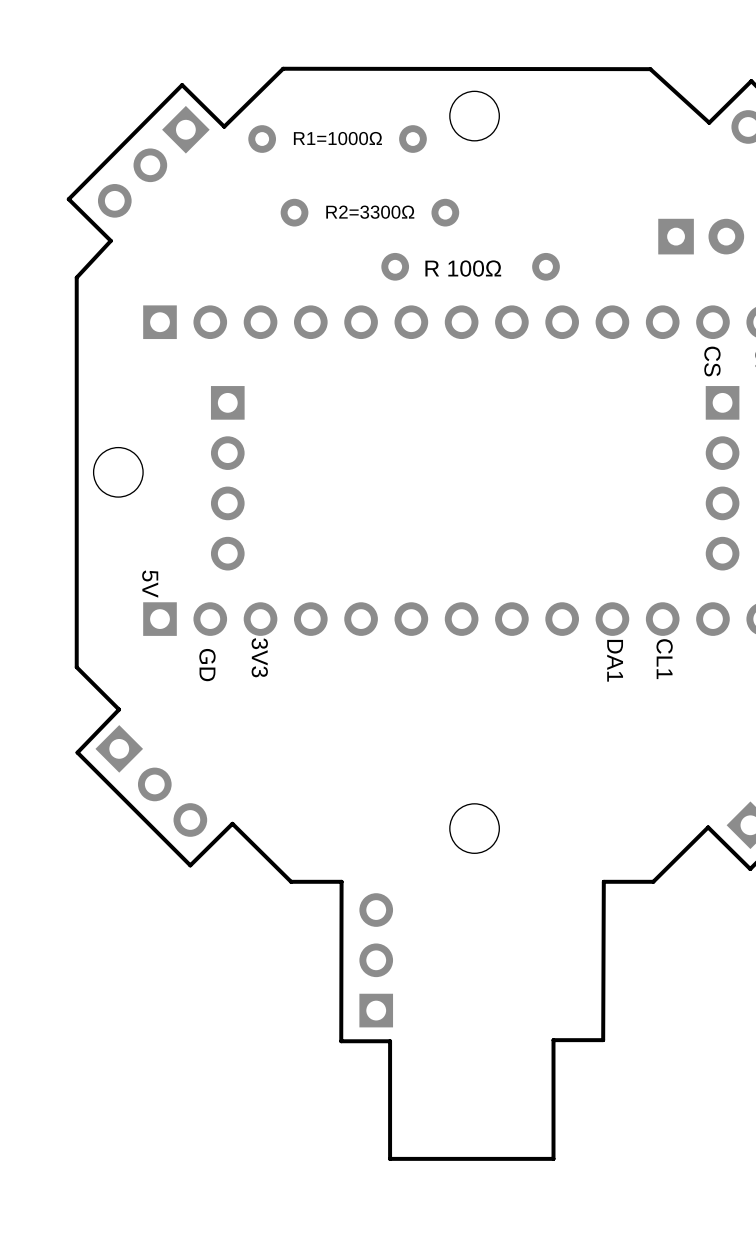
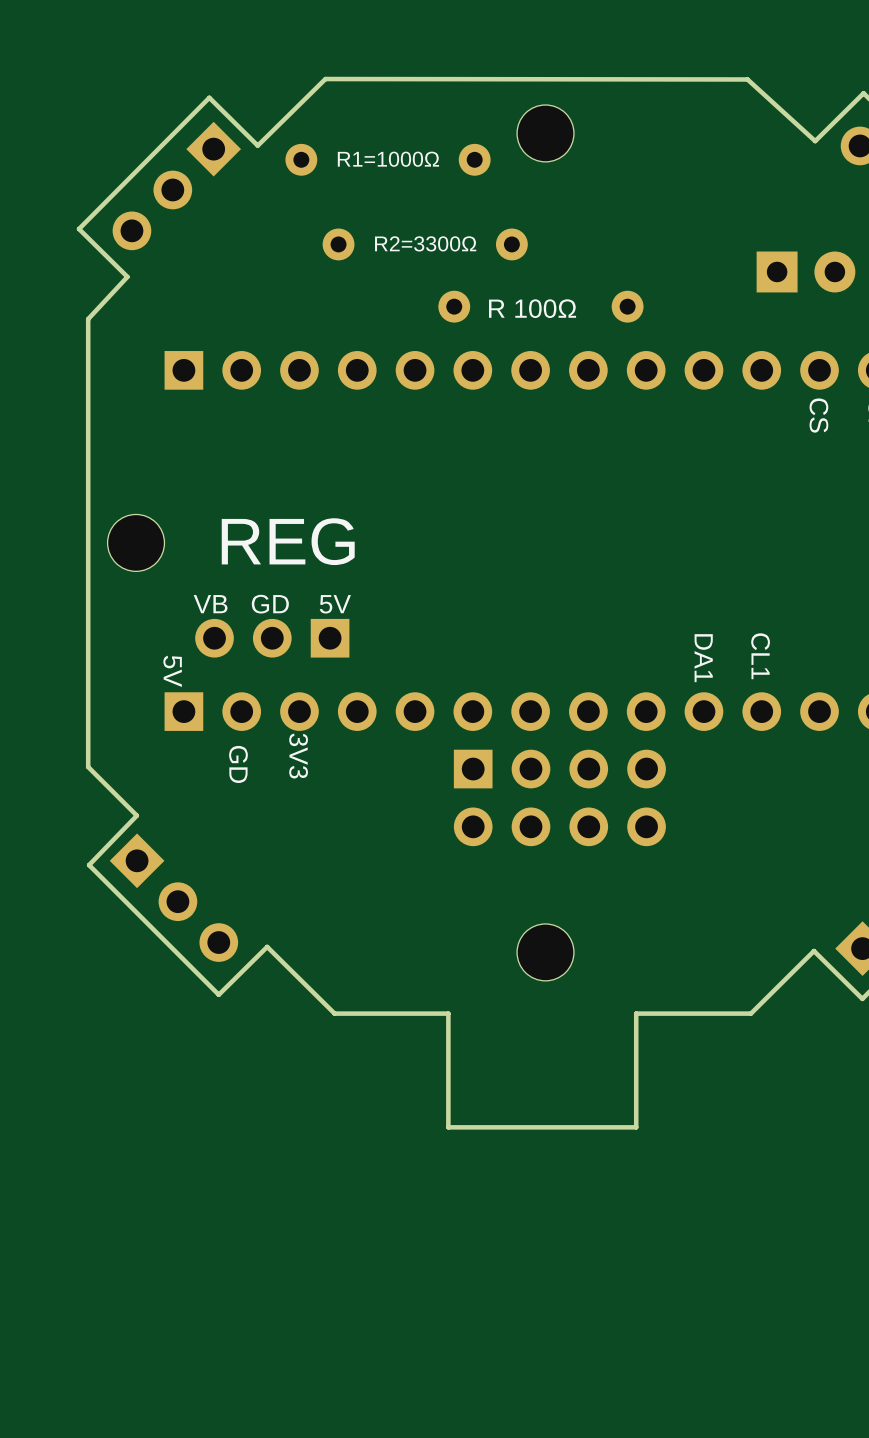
text: none -> REG (288, 541)
part: (227, 478) -> none
part: (722, 478) -> none
text: none -> VB (210, 604)
text: none -> GD (270, 604)
text: none -> 5V (335, 604)
text position: CL1 (664, 659) -> CL1 (760, 656)
text position: DA1 (615, 660) -> DA1 (703, 658)
part: none -> (559, 797)
board edge: (603, 881) (603, 1040) (553, 1040) (553, 1158) (390, 1158) (390, 1041) (341, 1041) (341, 881) -> (694, 1013) (636, 1013) (636, 1127) (448, 1127) (448, 1013) (392, 1013)
part rotation: 0° (376, 960) -> 90° counterclockwise (272, 638)
part position: (376, 960) -> (272, 638)

